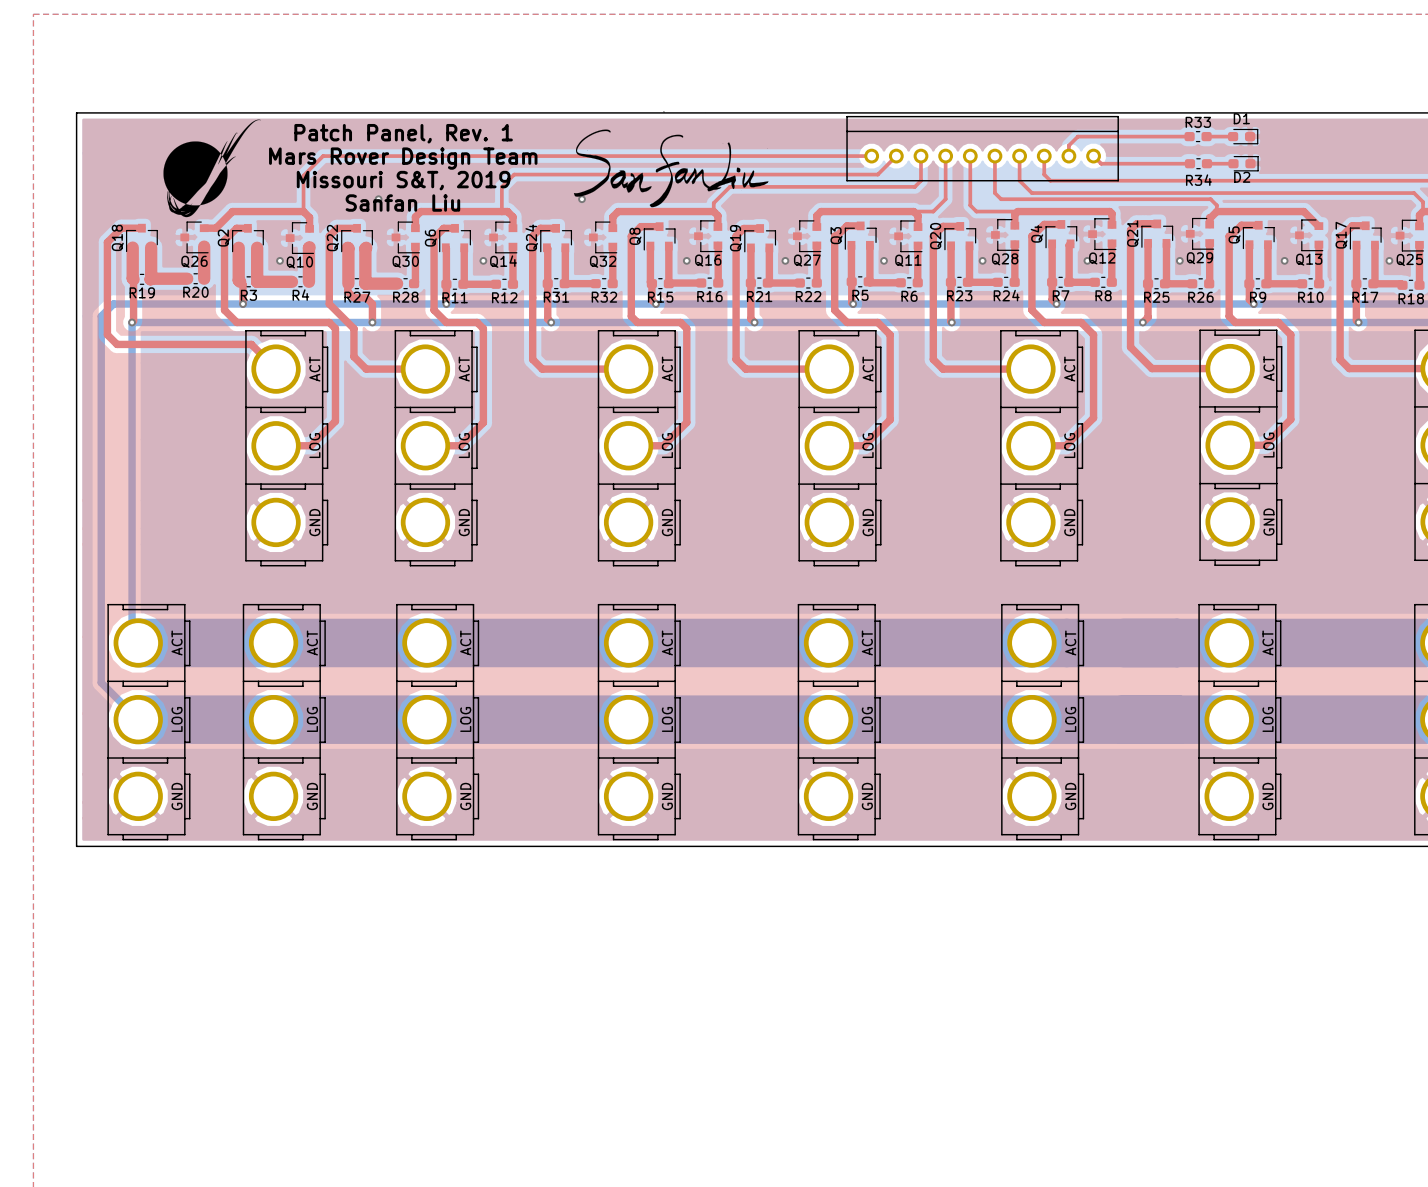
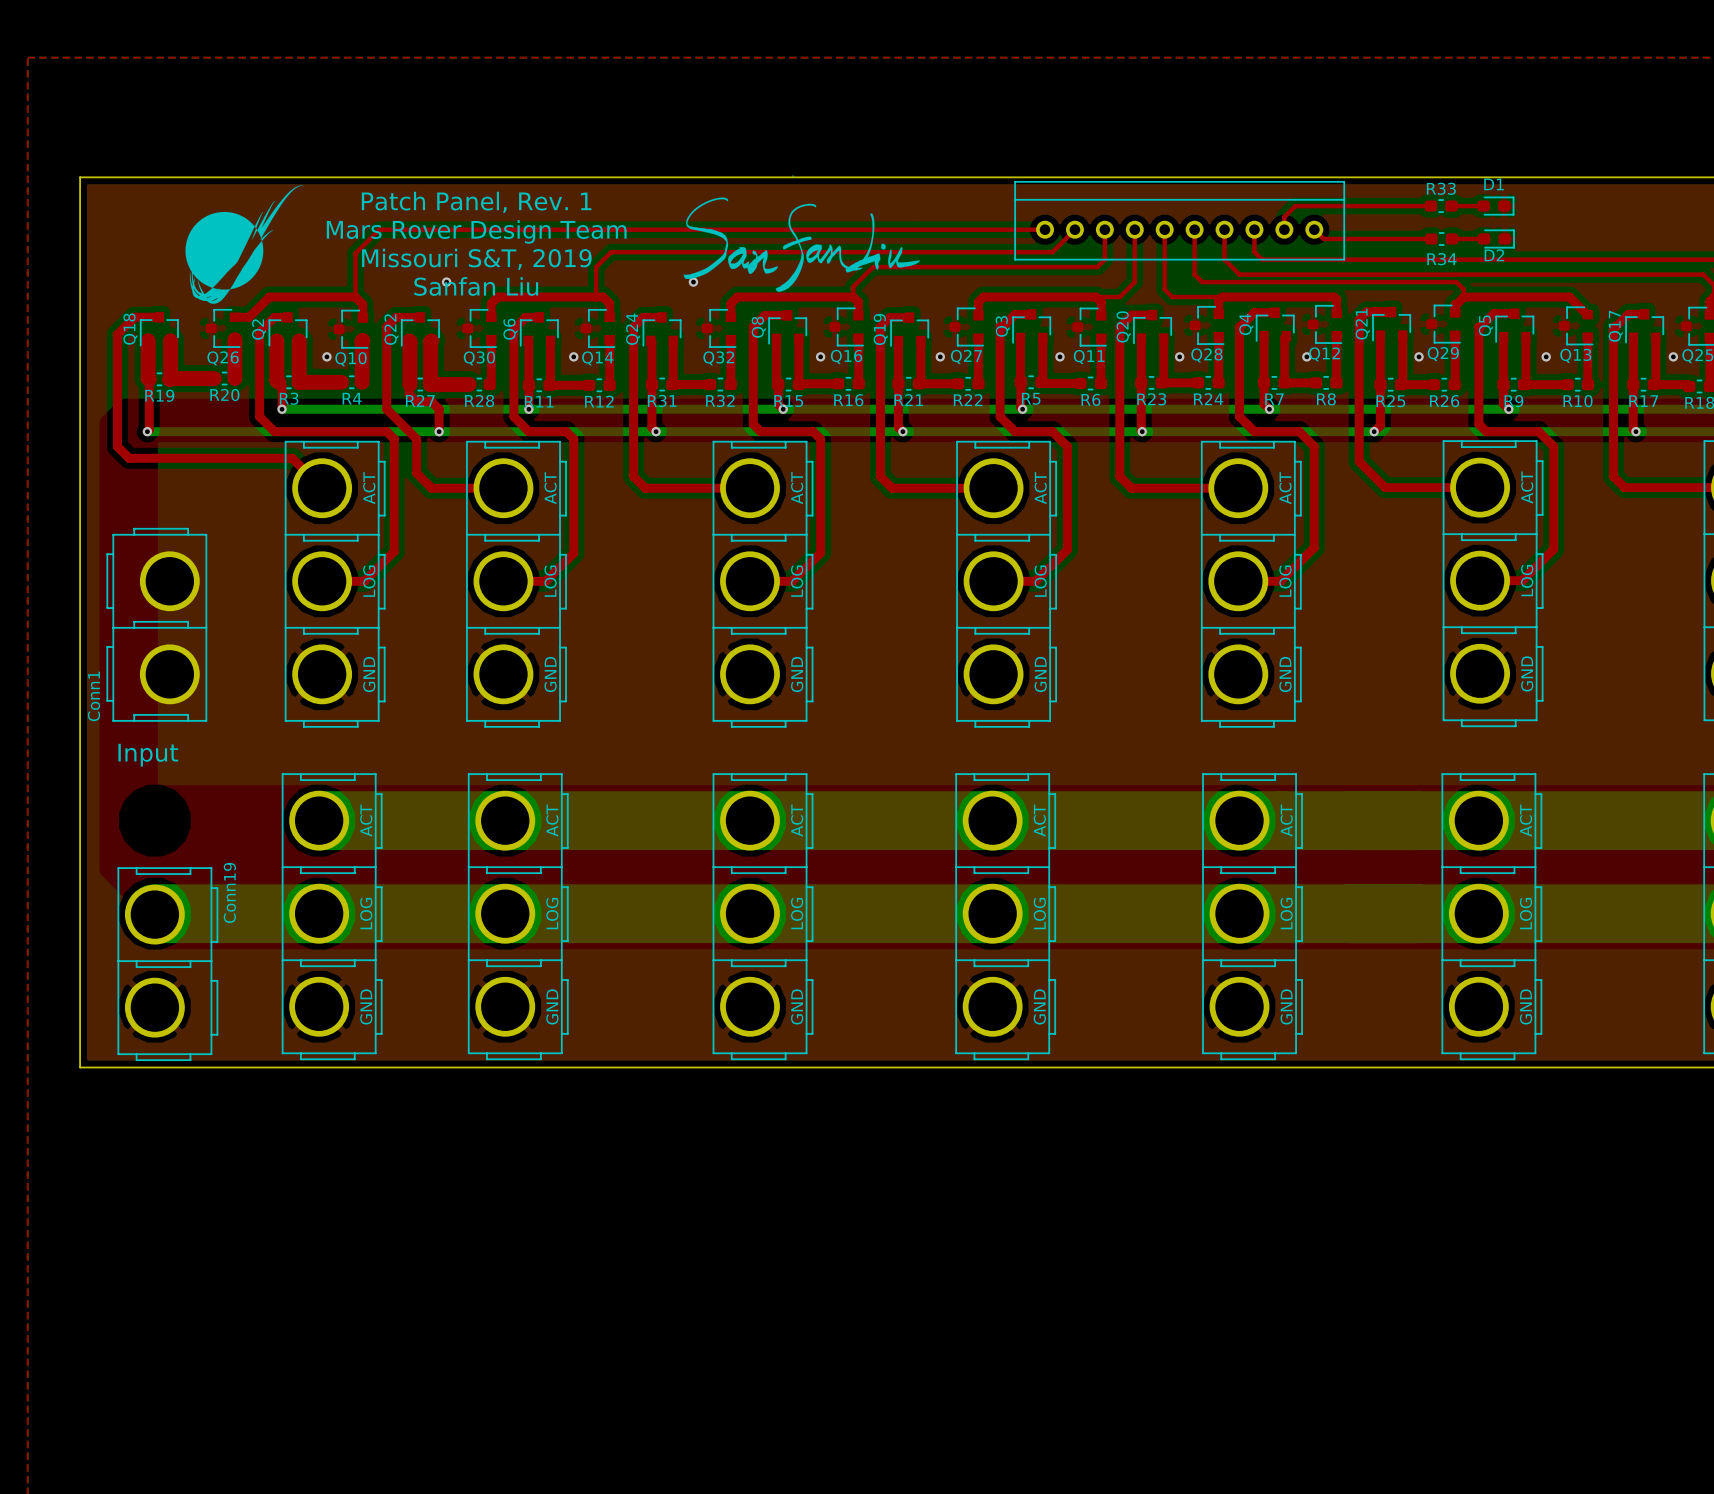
bottom track: (243, 304) (113, 304) (101, 316) (101, 682) (138, 719) -> none
bottom track: (132, 322) (132, 636) (138, 642) (273, 642) -> none
Conn1: none -> (156, 624)
text: none -> Input (148, 755)
part: (148, 722) -> none
Conn19: none -> (167, 964)

